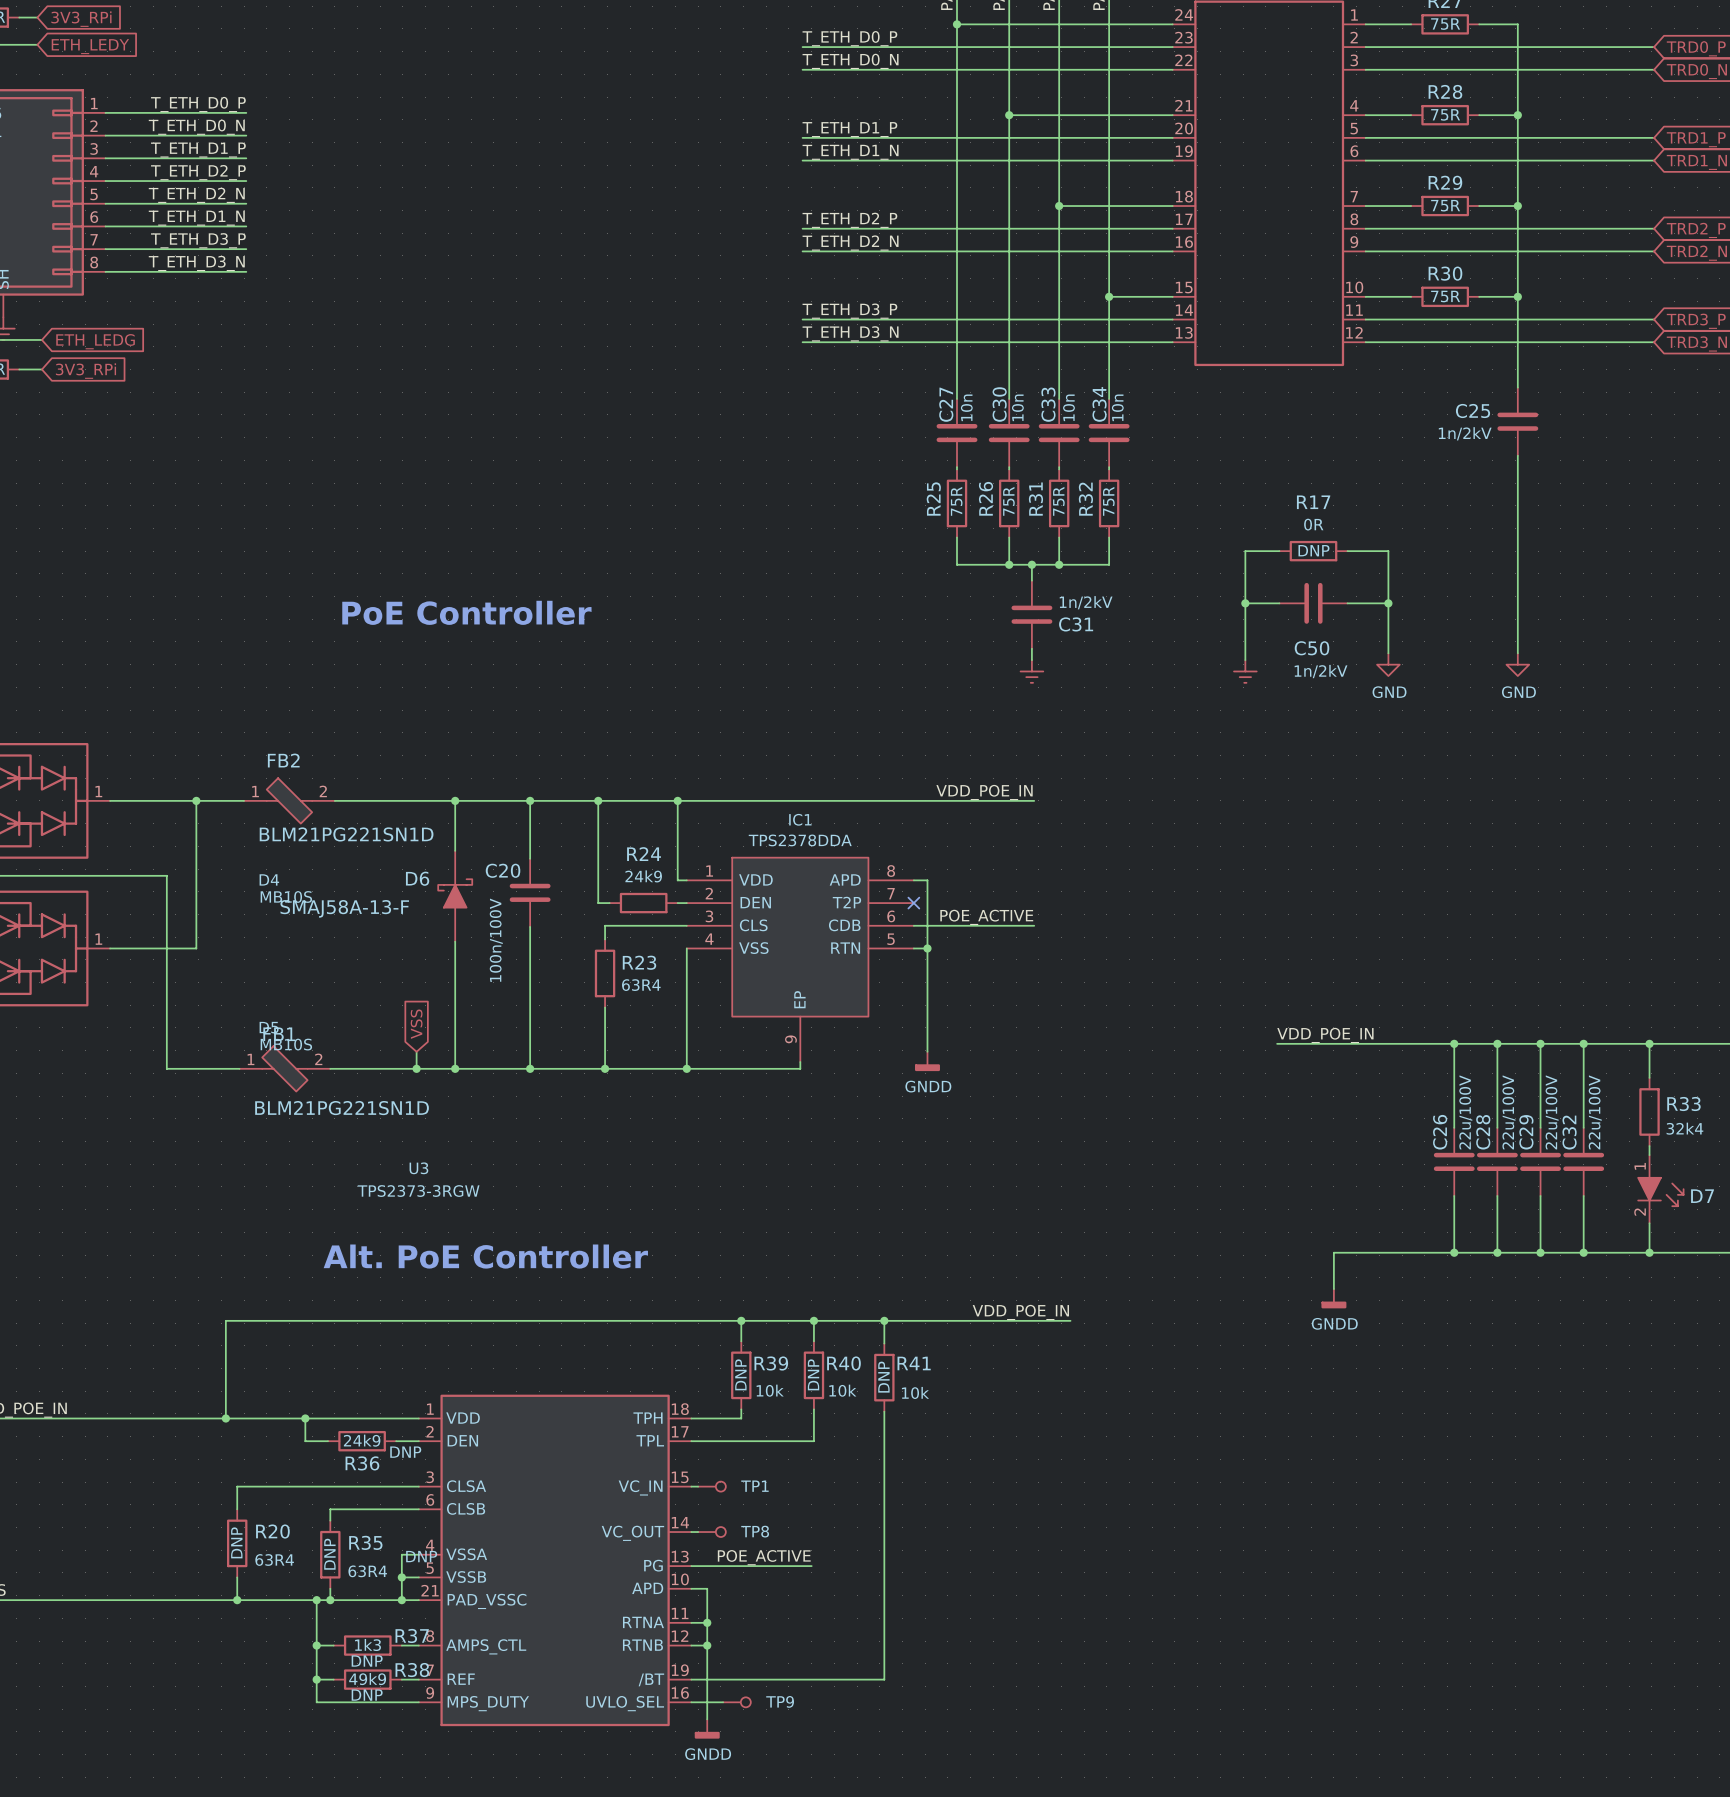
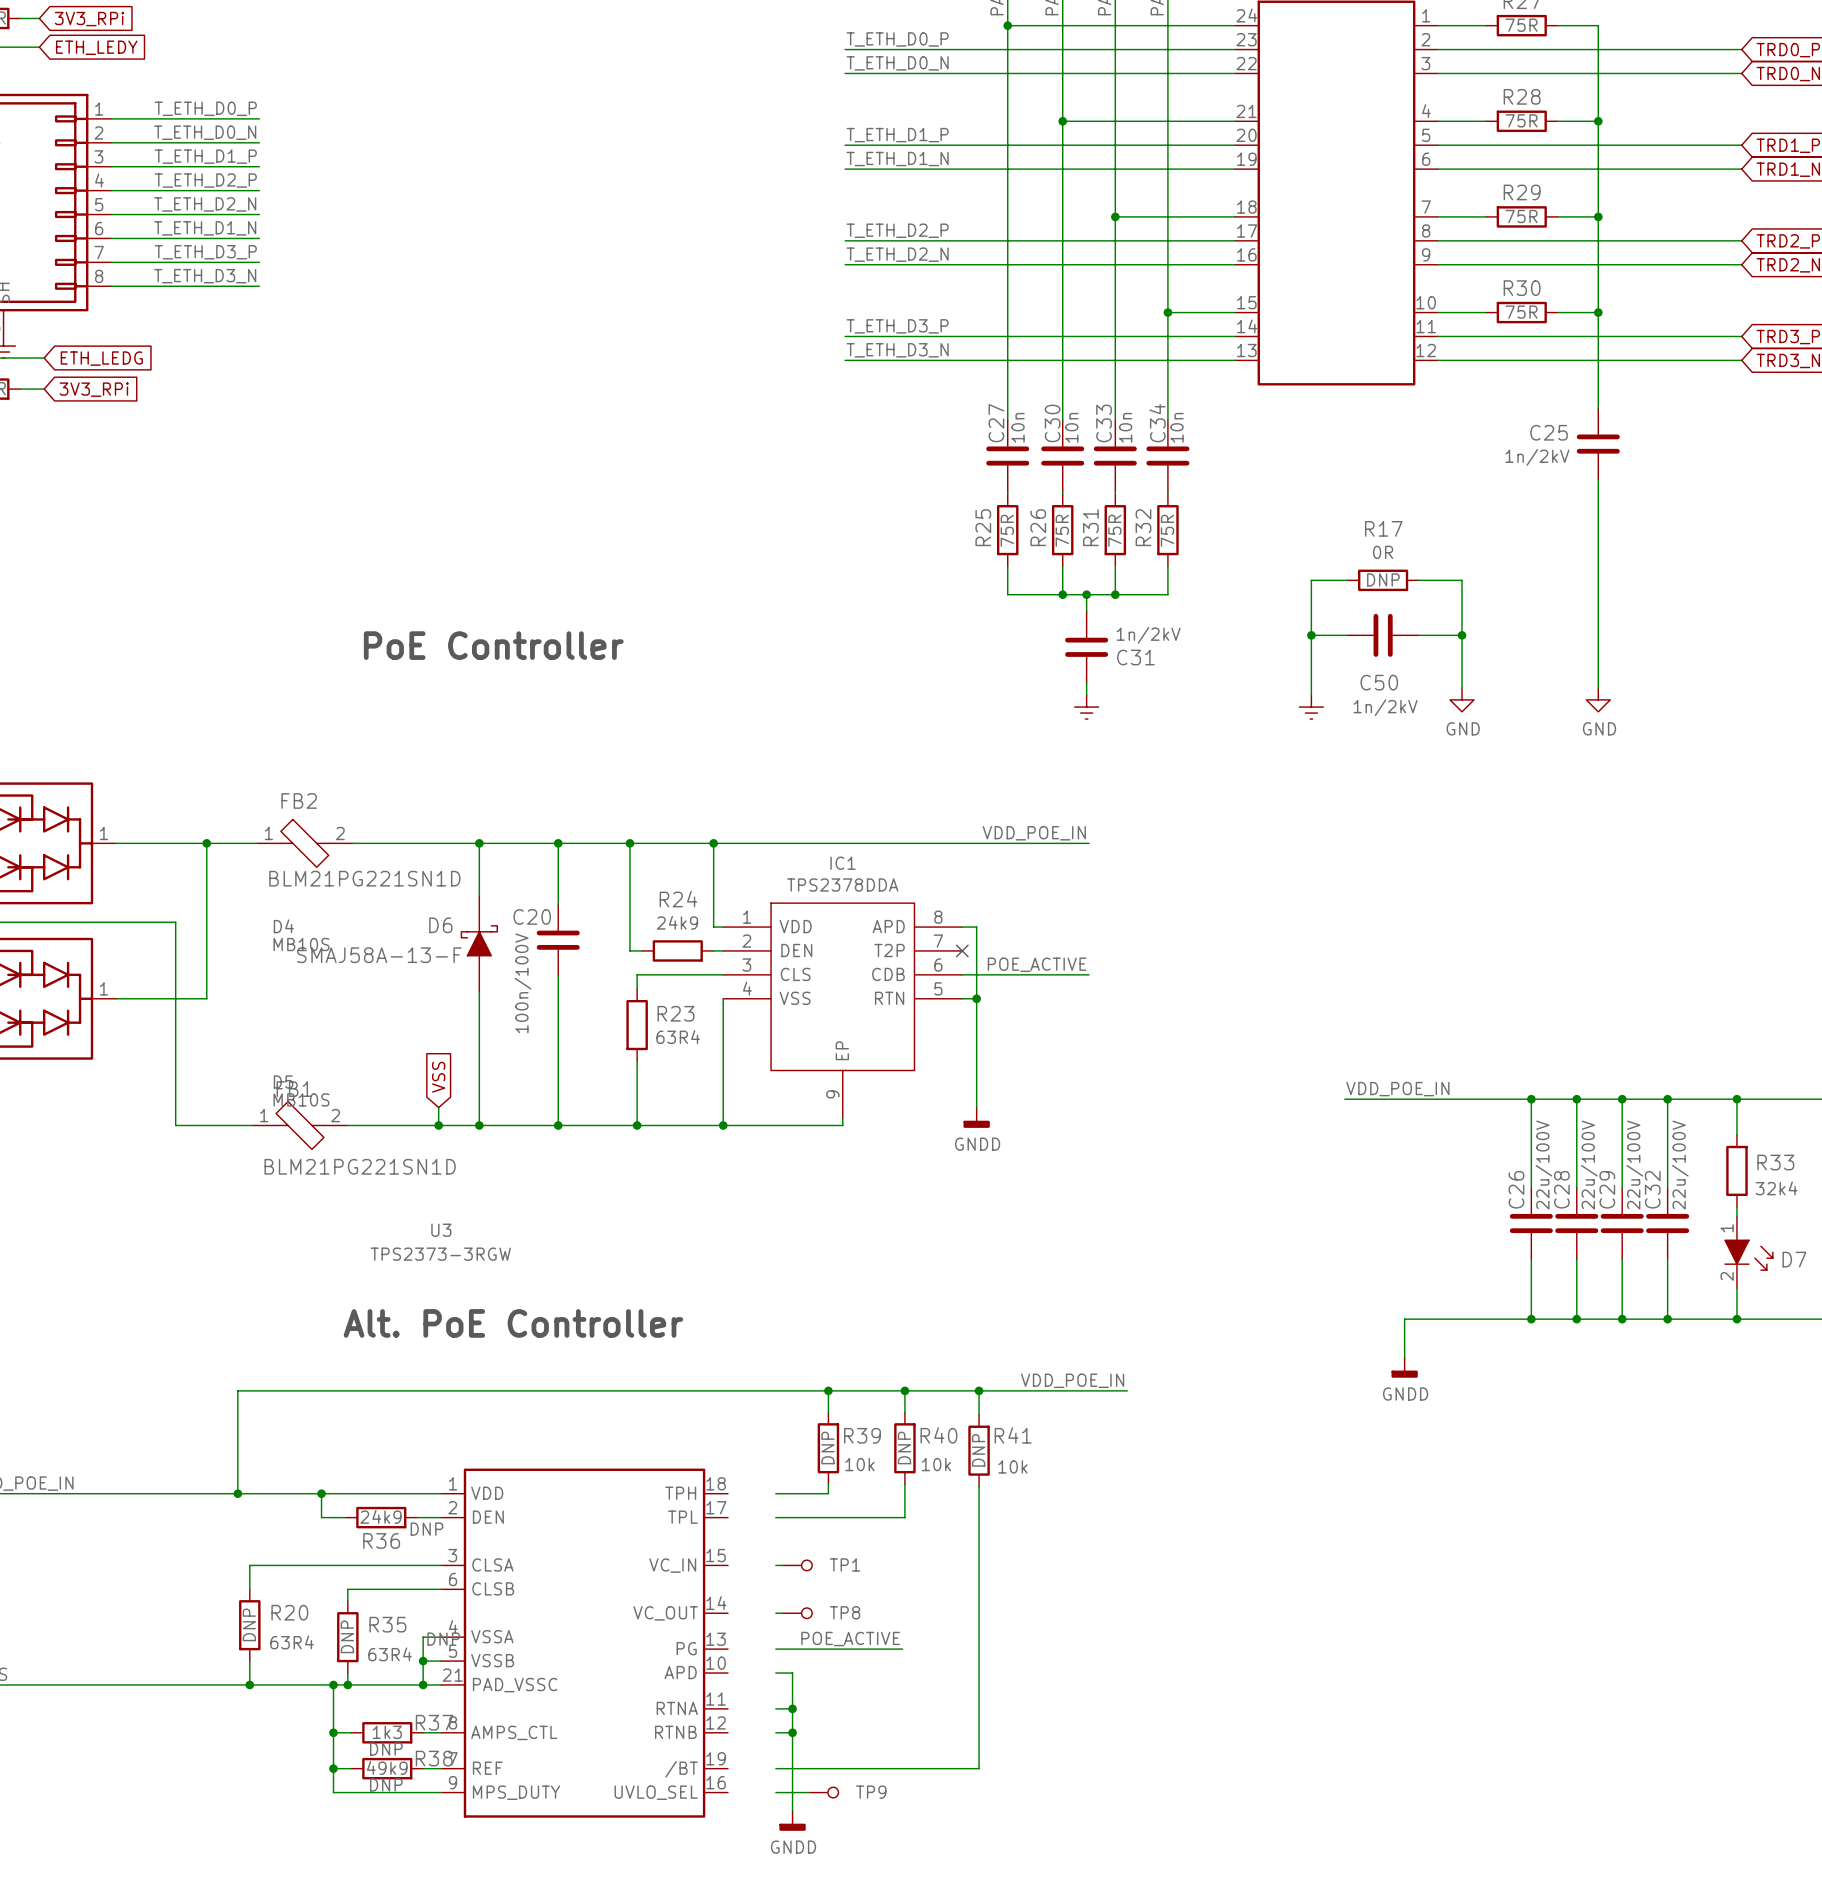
wire: (741, 1320) (741, 1341) -> (828, 1390) (828, 1412)
junction: (741, 1320) -> none
junction: none -> (828, 1390)
wire: (813, 1320) (813, 1341) -> (904, 1390) (904, 1412)
junction: (813, 1320) -> none
junction: none -> (904, 1390)
wire: (884, 1320) (884, 1343) -> (979, 1390) (979, 1414)
junction: (884, 1320) -> none
junction: none -> (979, 1390)
R39 position: (741, 1375) -> (828, 1448)
R40 position: (813, 1375) -> (904, 1448)
R41 position: (884, 1377) -> (979, 1450)
wire: (741, 1409) (741, 1418) -> (828, 1484) (828, 1493) (780, 1493)
wire: (813, 1409) (813, 1441) -> (904, 1484) (904, 1517) (857, 1517)
wire: (884, 1411) (884, 1679) -> (979, 1486) (979, 1768) (931, 1768)
wire: (691, 1418) (736, 1418) -> none
wire: (691, 1441) (736, 1441) -> none
wire: (691, 1486) (698, 1486) -> (775, 1565) (782, 1565)
TP1 position: (712, 1486) -> (797, 1565)
wire: (691, 1532) (698, 1532) -> (775, 1613) (782, 1613)
TP8 position: (712, 1532) -> (797, 1613)
label position: POE_ACTIVE (764, 1557) -> POE_ACTIVE (850, 1639)
wire: (691, 1566) (736, 1566) -> (854, 1649) (902, 1649)
wire: (691, 1588) (707, 1588) (707, 1719) -> (775, 1673) (792, 1673) (792, 1810)
wire: (691, 1622) (707, 1622) -> (775, 1708) (792, 1708)
junction: (707, 1622) -> none
junction: none -> (792, 1708)
wire: (691, 1645) (707, 1645) -> (775, 1732) (792, 1732)
junction: (707, 1645) -> none
junction: none -> (792, 1732)
wire: (691, 1679) (736, 1679) -> none
wire: (691, 1702) (723, 1702) -> (775, 1792) (809, 1792)
TP9 position: (736, 1702) -> (823, 1792)
power symbol position: GNDD (707, 1728) -> GNDD (792, 1820)

